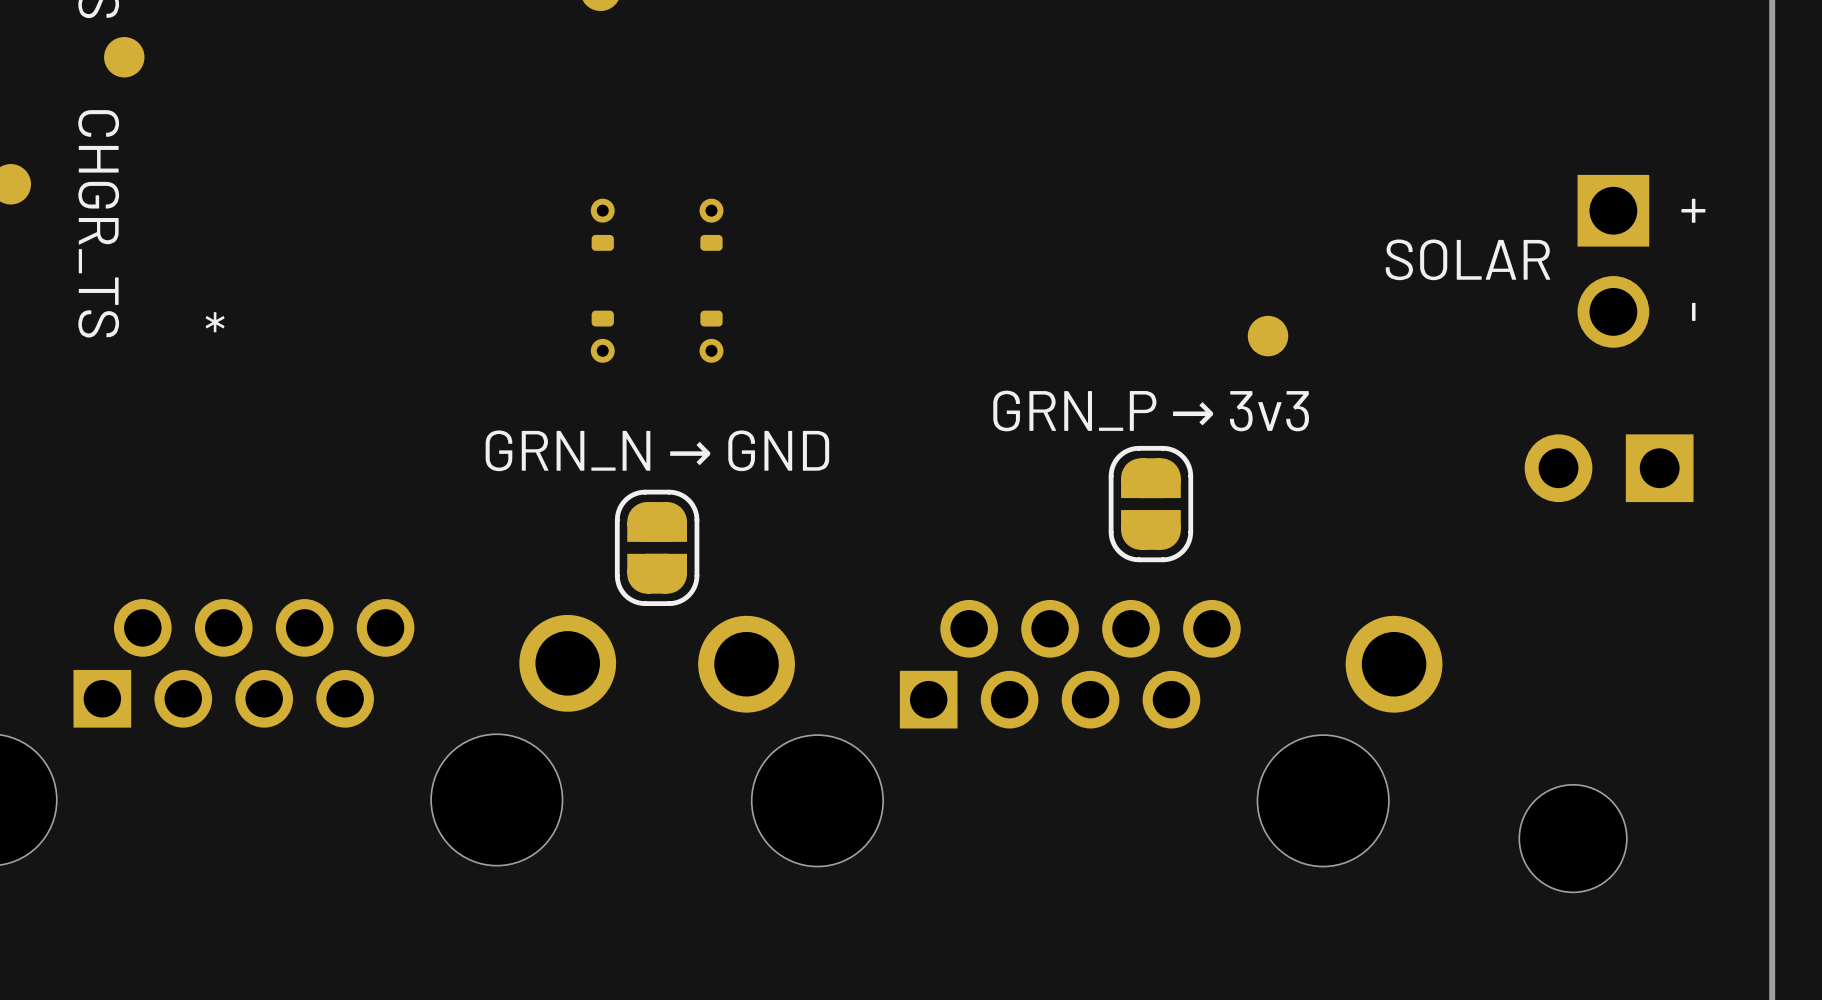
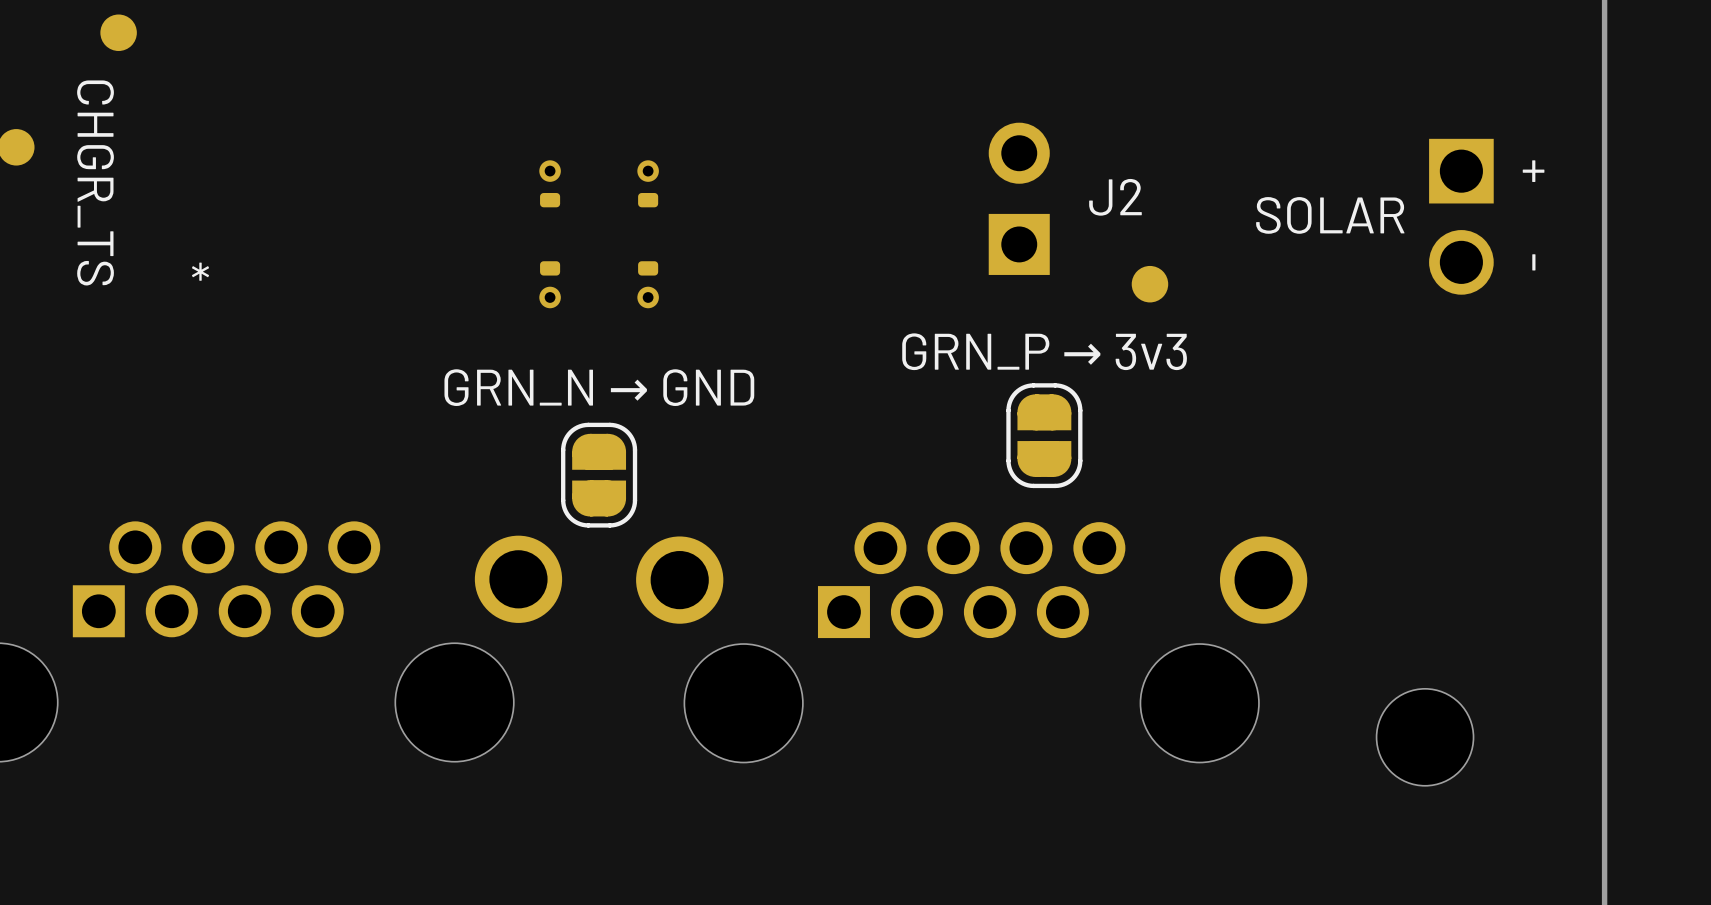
J2: none -> (1019, 198)
part: (1609, 468) -> none

